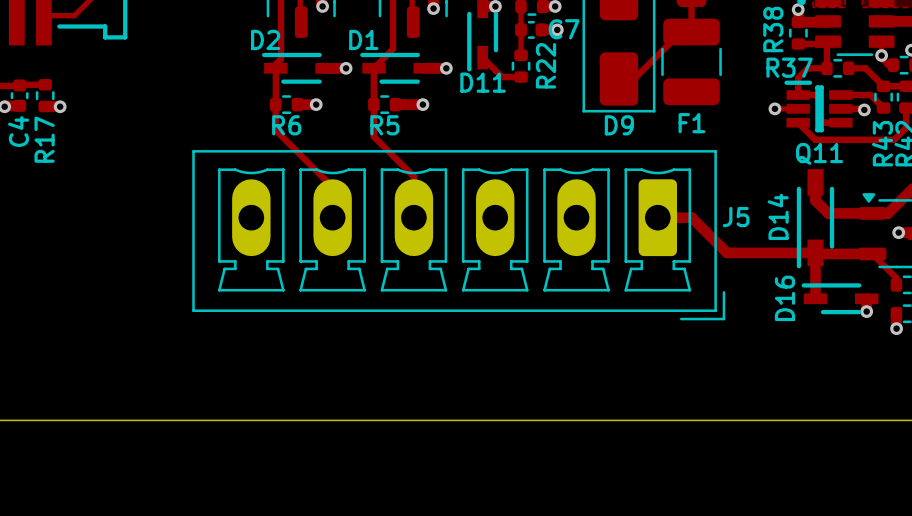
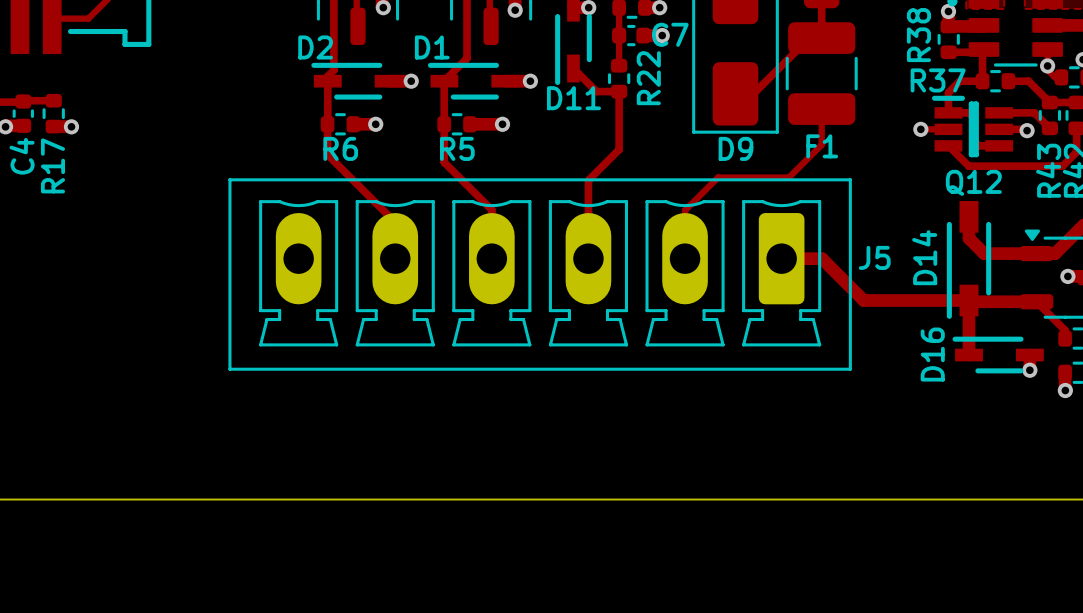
track: none -> (619, 91) (619, 149) (588, 180) (588, 258)
track: none -> (821, 109) (821, 144) (789, 177) (718, 177) (685, 210) (685, 258)
J5 footprint: [192, 150, 726, 321] -> [228, 178, 852, 371]
Q11 name: Q11 (819, 153) -> Q12 (973, 182)

